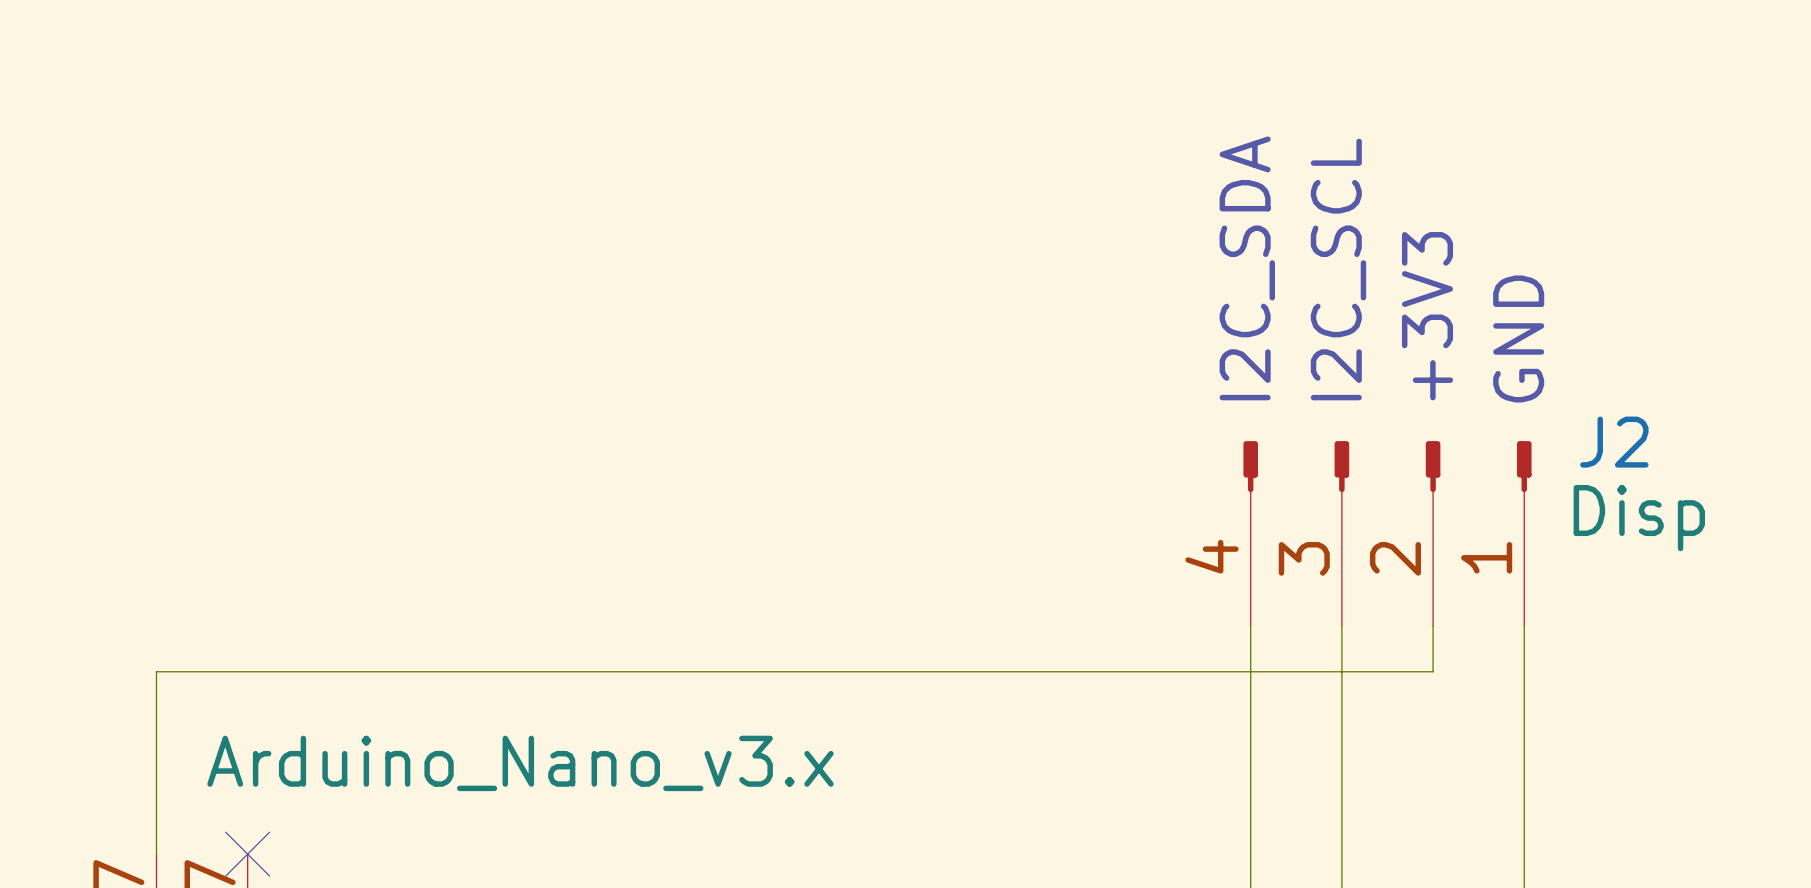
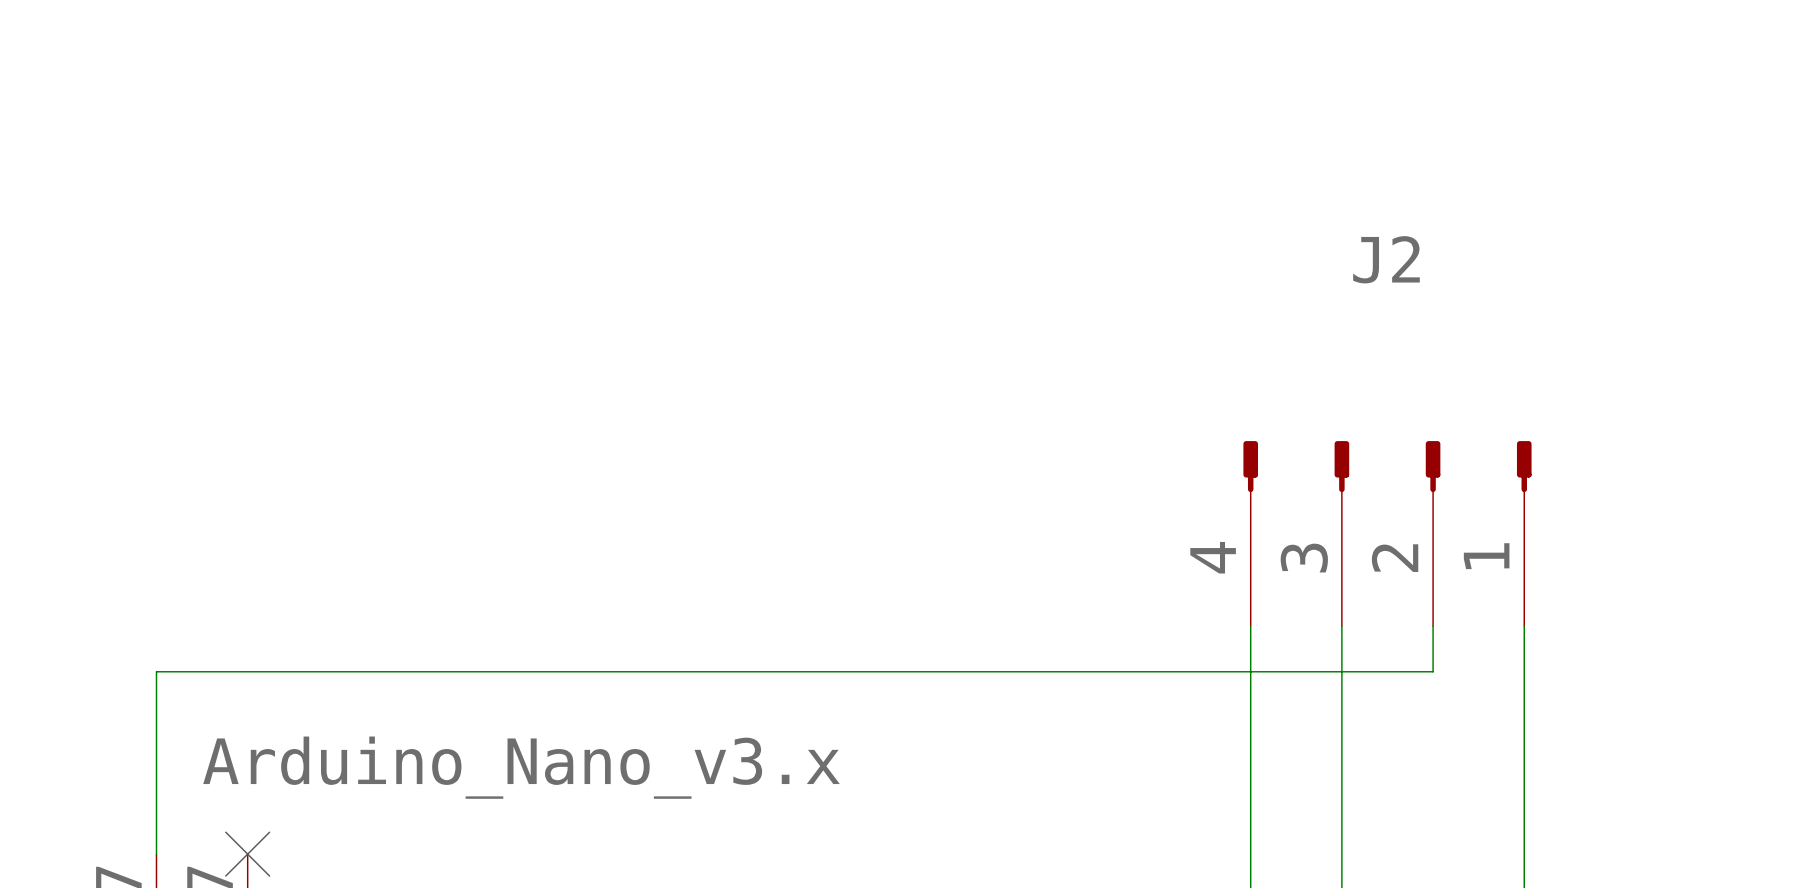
text: I2C_SDA (1247, 268) -> none
text: I2C_SCL (1338, 269) -> none
text: +3V3 (1427, 316) -> none
text: GND (1518, 338) -> none
J2 name position: J2 (1614, 442) -> J2 (1386, 259)
J2 value: Disp (1639, 518) -> none

